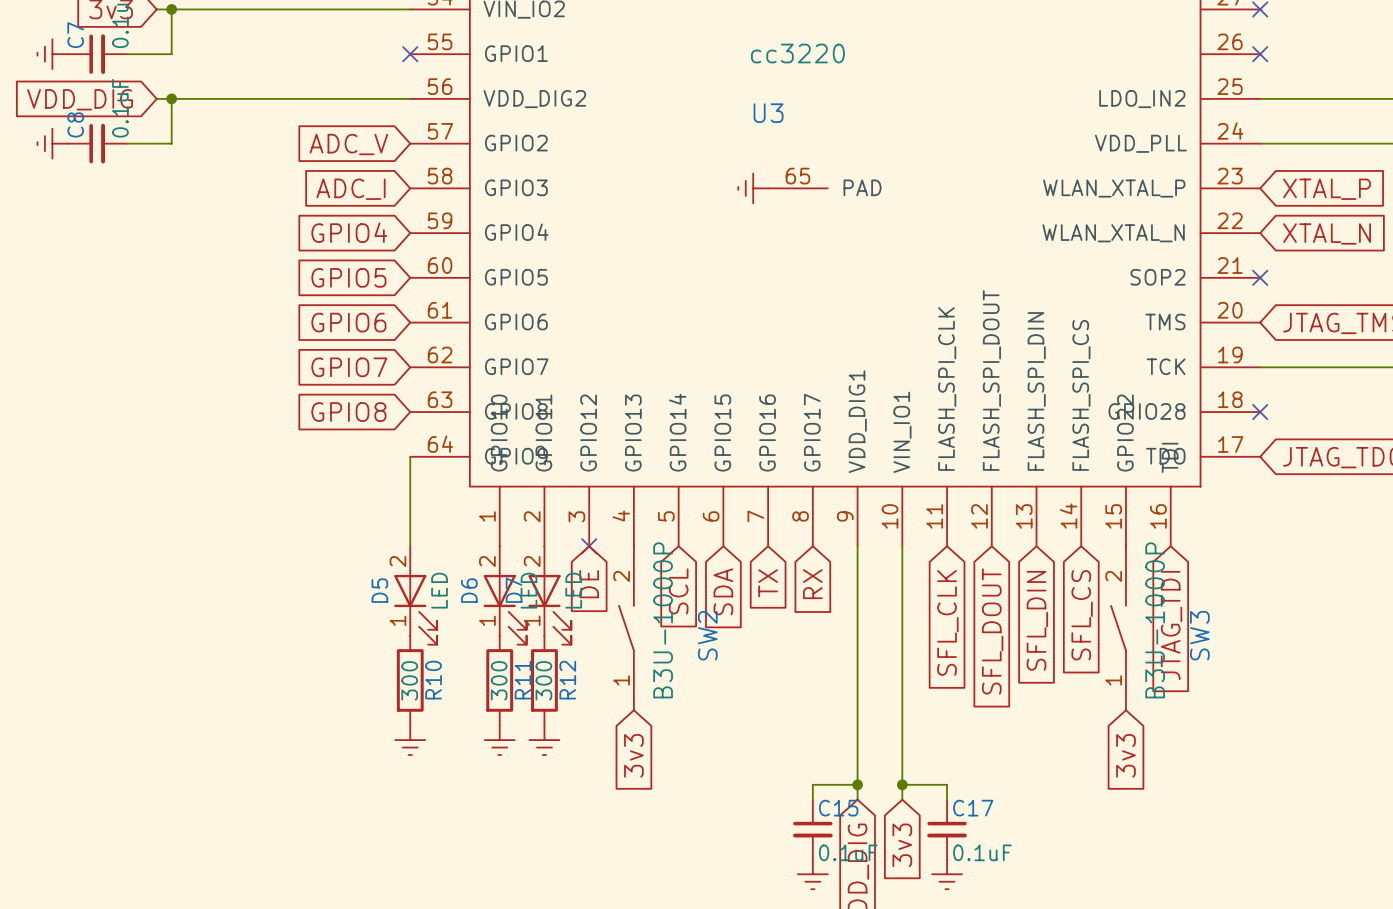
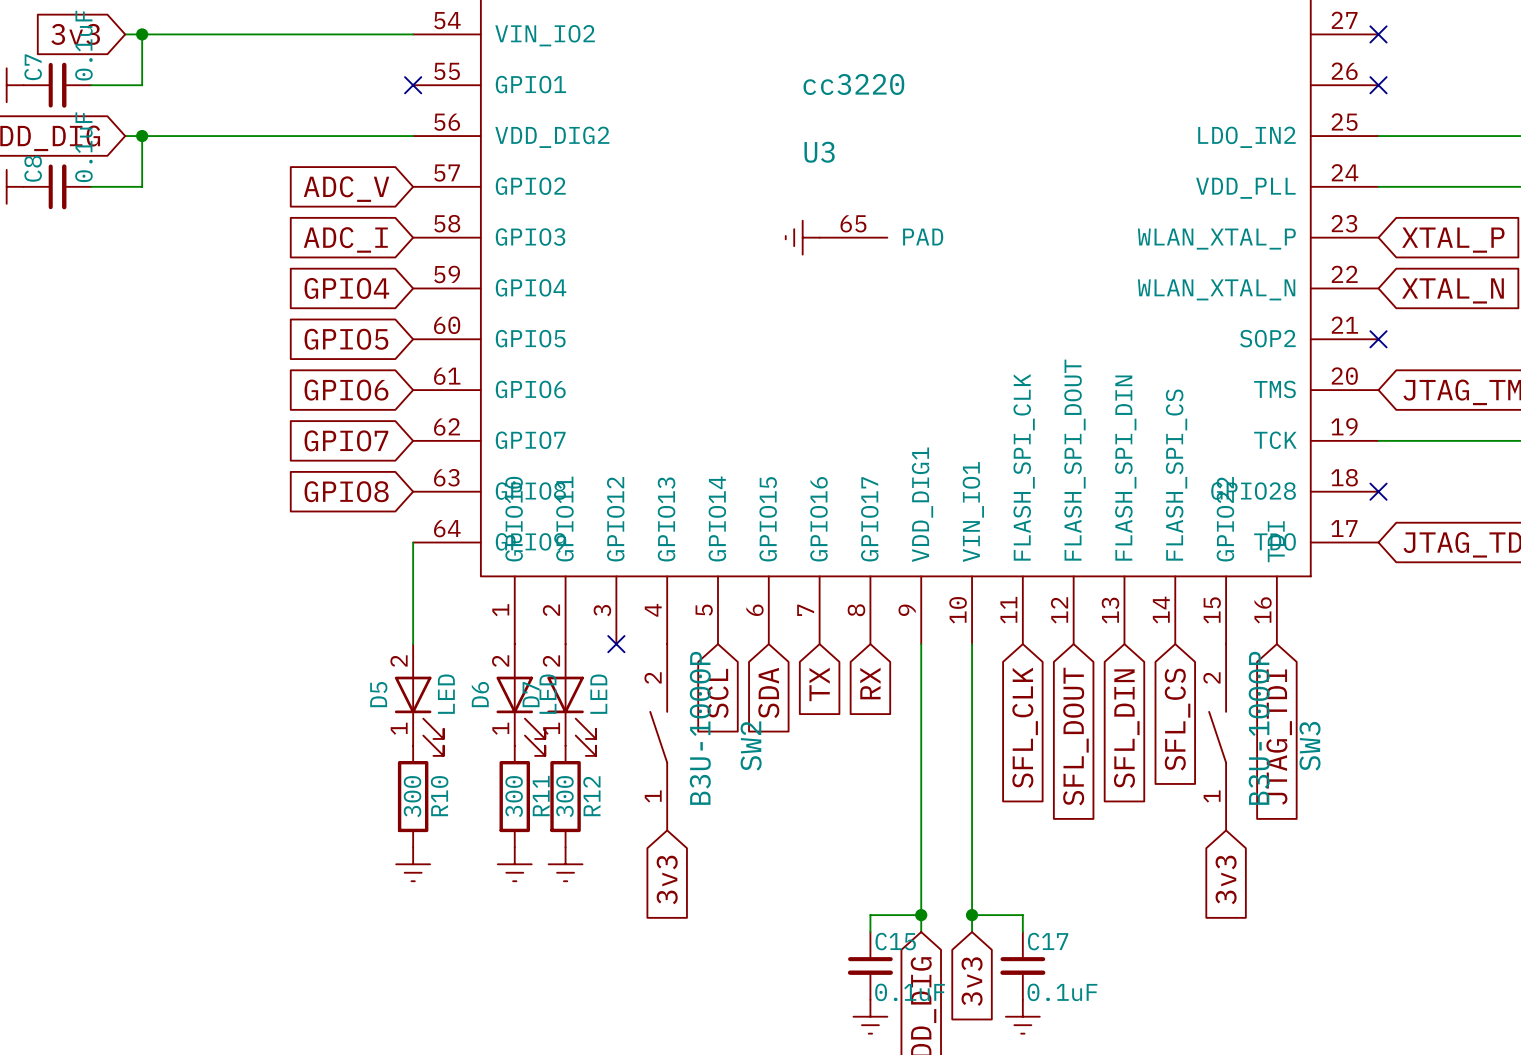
global label: DE (589, 584) -> none

